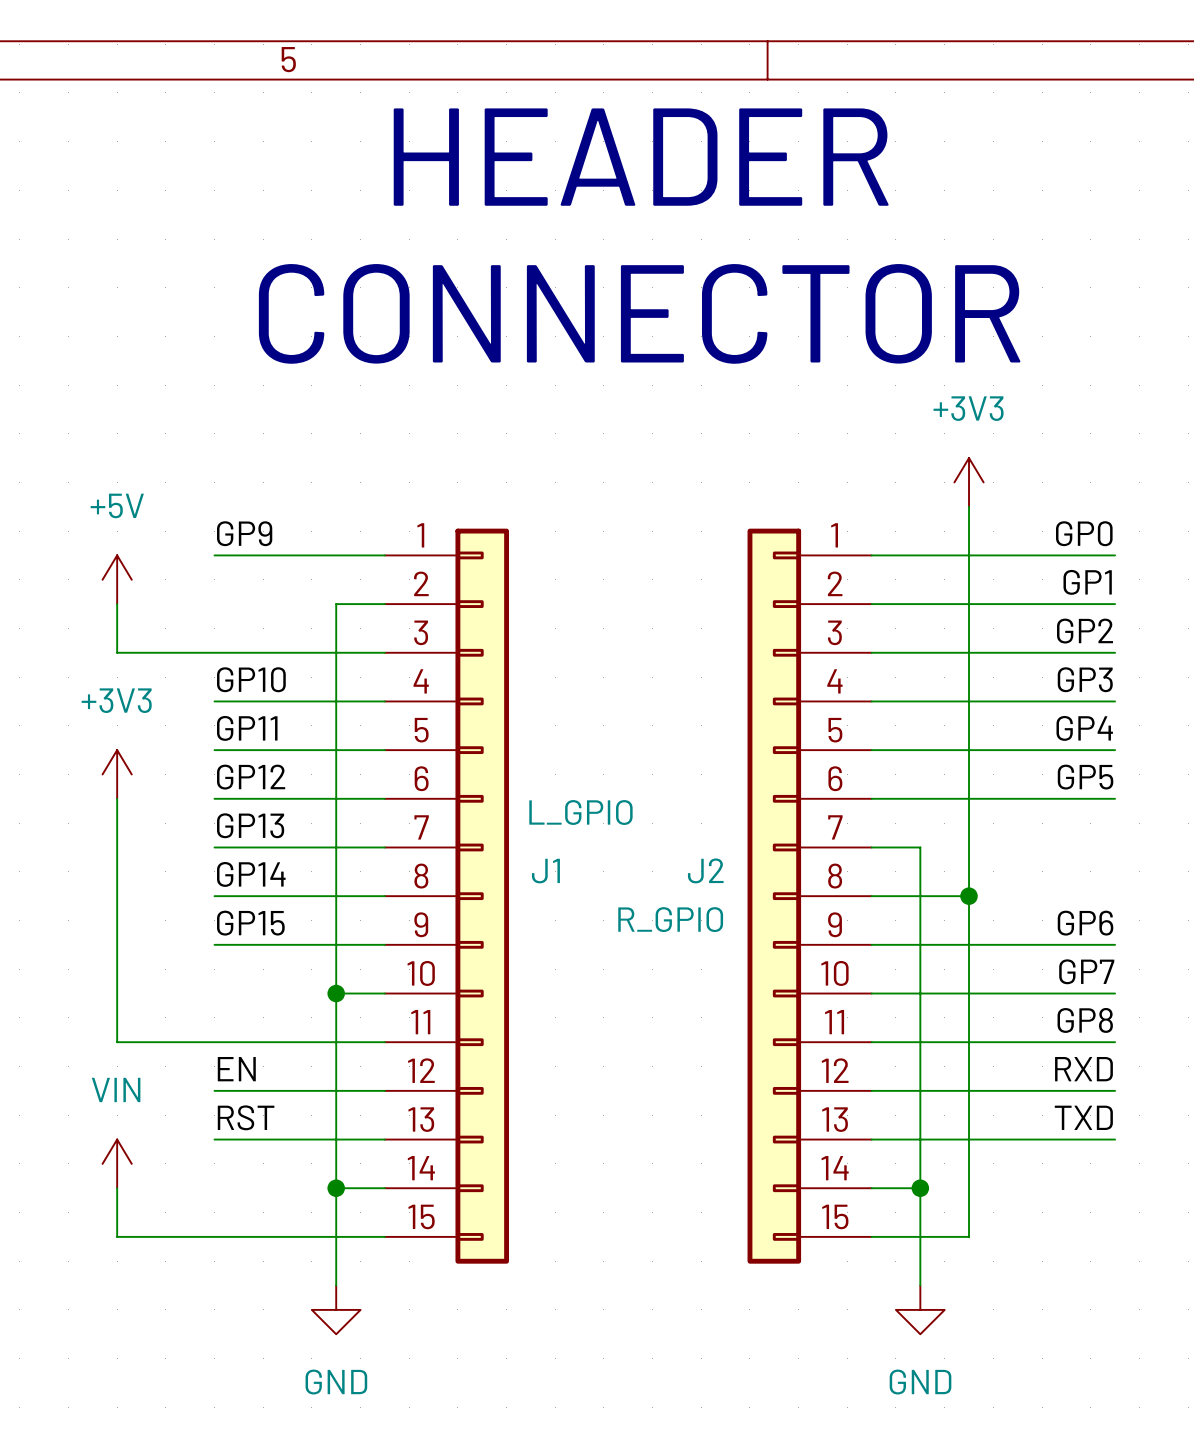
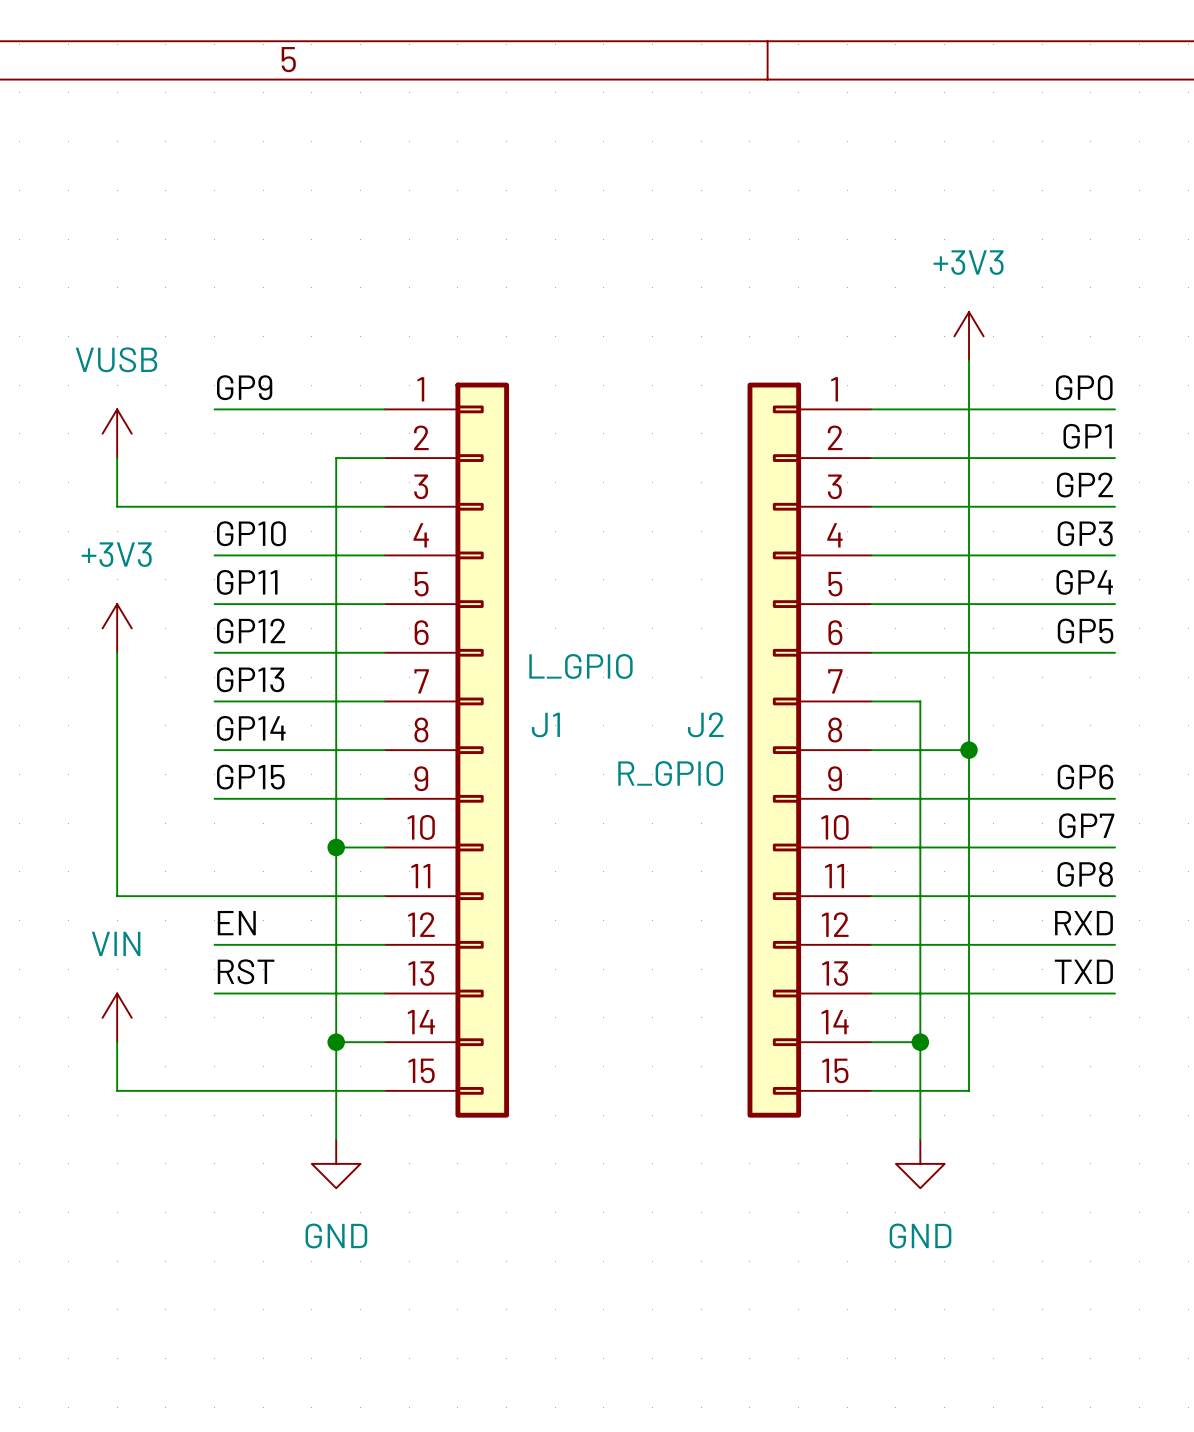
text: HEADER (641, 157) -> none
text: CONNECTOR (639, 313) -> none
wire: none -> (969, 360) (969, 506)
label: none -> GP9 (244, 387)
label: none -> GP0 (1084, 387)
wire: none -> (214, 409) (384, 409)
wire: none -> (871, 409) (1115, 409)
power symbol: none -> VUSB (117, 433)
label: none -> GP1 (1087, 436)
wire: none -> (117, 458) (117, 506) (384, 506)
wire: none -> (384, 458) (336, 458) (336, 604) (214, 604)
wire: none -> (871, 458) (1115, 458)
power symbol position: +3V3 (969, 482) -> +3V3 (969, 336)
label: none -> GP2 (1085, 485)
wire: none -> (871, 506) (1115, 506)
label: GP9 (244, 533) -> GP10 (251, 533)
label: GP0 (1084, 533) -> GP3 (1085, 533)
power symbol: +5V (117, 579) -> none
label: none -> GP11 (247, 582)
label: GP1 (1087, 582) -> GP4 (1084, 582)
wire: (117, 604) (117, 652) (214, 652) -> (117, 1042) (117, 1090) (214, 1090)
label: none -> GP12 (251, 631)
label: GP2 (1085, 631) -> GP5 (1085, 631)
wire: none -> (117, 652) (117, 798)
label: GP10 (251, 679) -> GP13 (250, 679)
label: GP3 (1085, 679) -> none
wire: (920, 701) (1115, 701) -> (920, 701) (920, 847) (1115, 847)
label: GP11 (247, 728) -> GP14 (251, 728)
label: GP4 (1084, 728) -> none
wire: (969, 750) (1115, 750) -> (969, 896) (1115, 896)
junction: none -> (969, 750)
power symbol position: +3V3 (117, 774) -> +3V3 (117, 628)
label: GP12 (251, 777) -> GP15 (250, 777)
label: GP5 (1085, 777) -> GP6 (1085, 777)
label: GP13 (250, 825) -> none
label: none -> GP7 (1086, 825)
wire: (214, 847) (336, 847) -> (214, 993) (336, 993)
junction: none -> (336, 847)
label: GP14 (251, 874) -> none
wire: (117, 896) (117, 1042) (336, 1042) -> (117, 896) (214, 896)
J1 position: (446, 896) -> (446, 750)
J2 position: (809, 896) -> (809, 750)
junction: (969, 896) -> none
label: GP15 (250, 923) -> EN (236, 923)
label: GP6 (1085, 923) -> RXD (1083, 923)
label: GP7 (1086, 971) -> TXD (1083, 971)
junction position: (336, 993) -> (336, 1042)
label position: GP8 (1085, 1020) -> GP8 (1085, 874)
wire: (920, 1042) (1115, 1042) -> none
junction: none -> (920, 1042)
label: EN (236, 1069) -> none
label: RXD (1083, 1069) -> none
wire: (1115, 1090) (969, 1090) (969, 1236) (871, 1236) -> none
label position: RST (246, 1117) -> RST (246, 971)
label: TXD (1083, 1117) -> none
wire: (214, 1139) (384, 1139) -> none
wire: (336, 1139) (336, 1285) -> none
wire: (871, 1139) (1115, 1139) -> none
wire: (920, 1139) (920, 1285) -> none
power symbol position: VIN (117, 1163) -> VIN (117, 1017)
wire: (117, 1188) (117, 1236) (384, 1236) -> none
wire: (336, 1188) (384, 1188) -> none
junction: (336, 1188) -> none
wire: (871, 1188) (920, 1188) -> none
junction: (920, 1188) -> none
power symbol position: GND (336, 1309) -> GND (336, 1163)
power symbol position: GND (920, 1309) -> GND (920, 1163)

